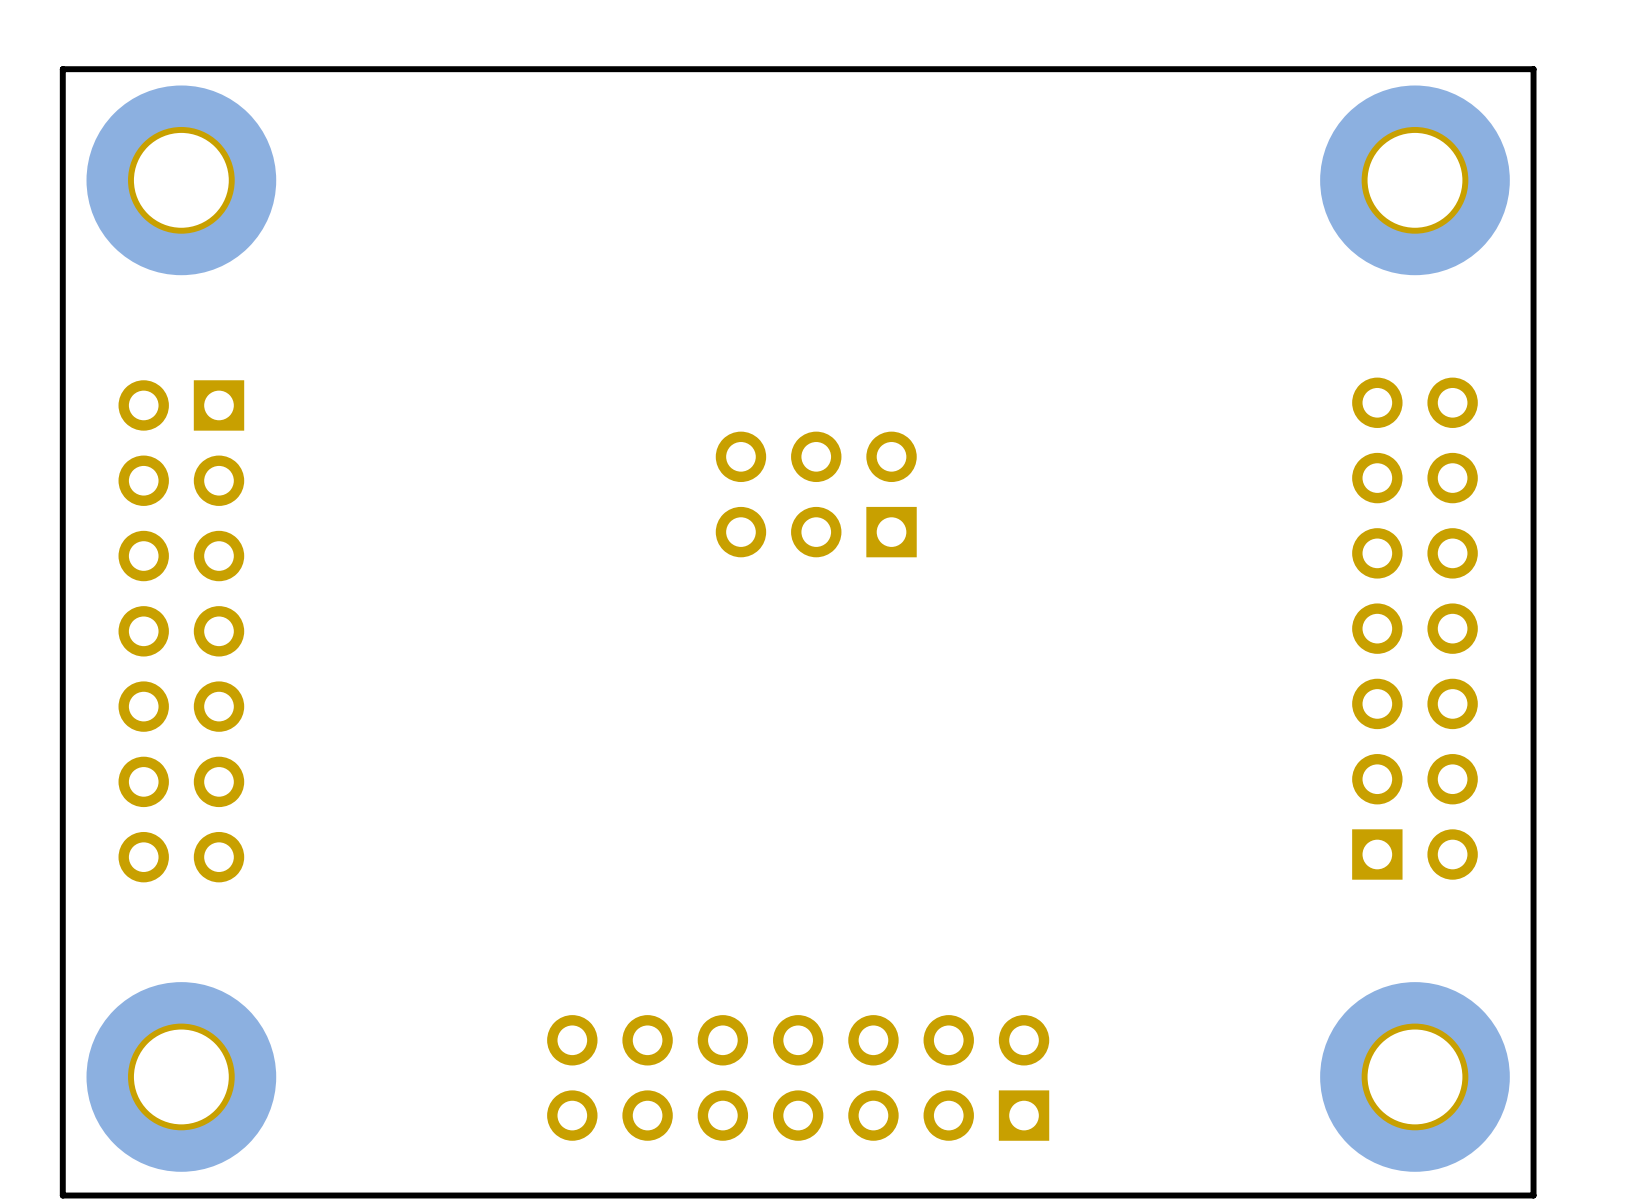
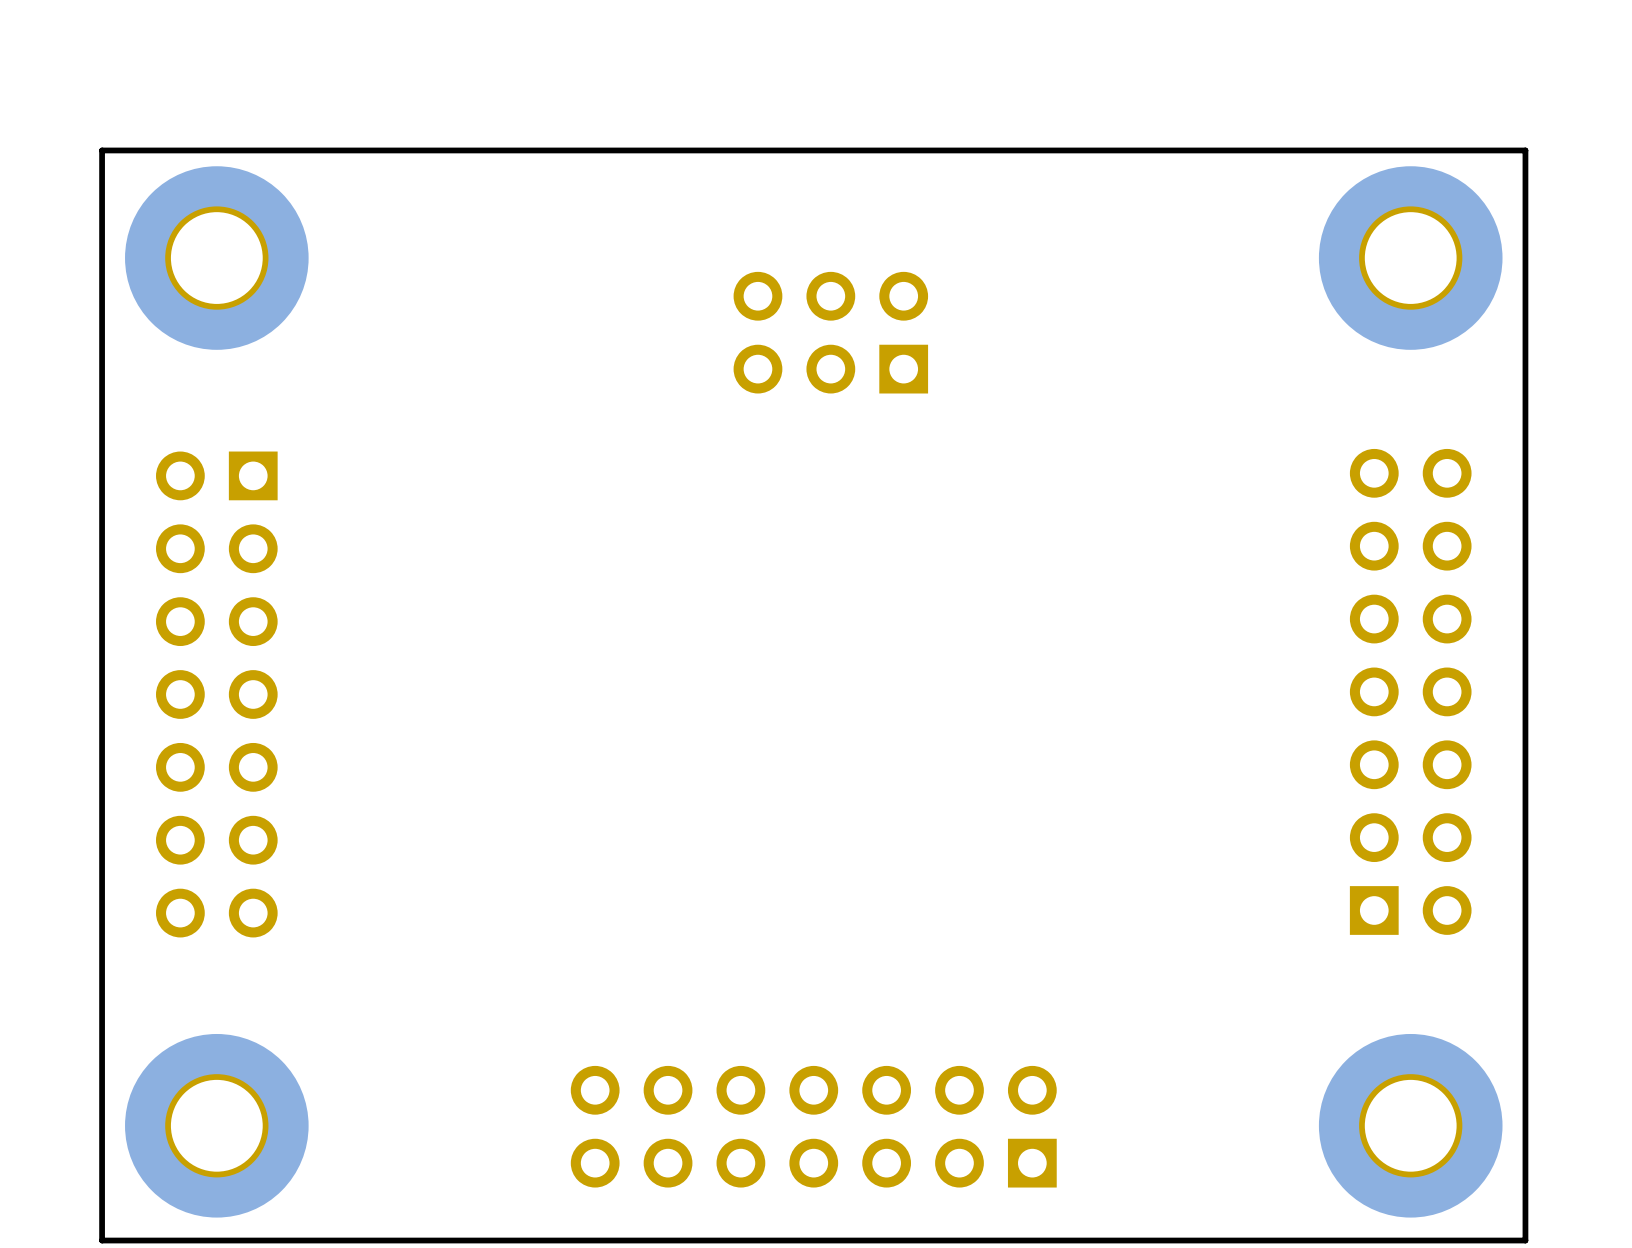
part position: (816, 494) -> (830, 332)

